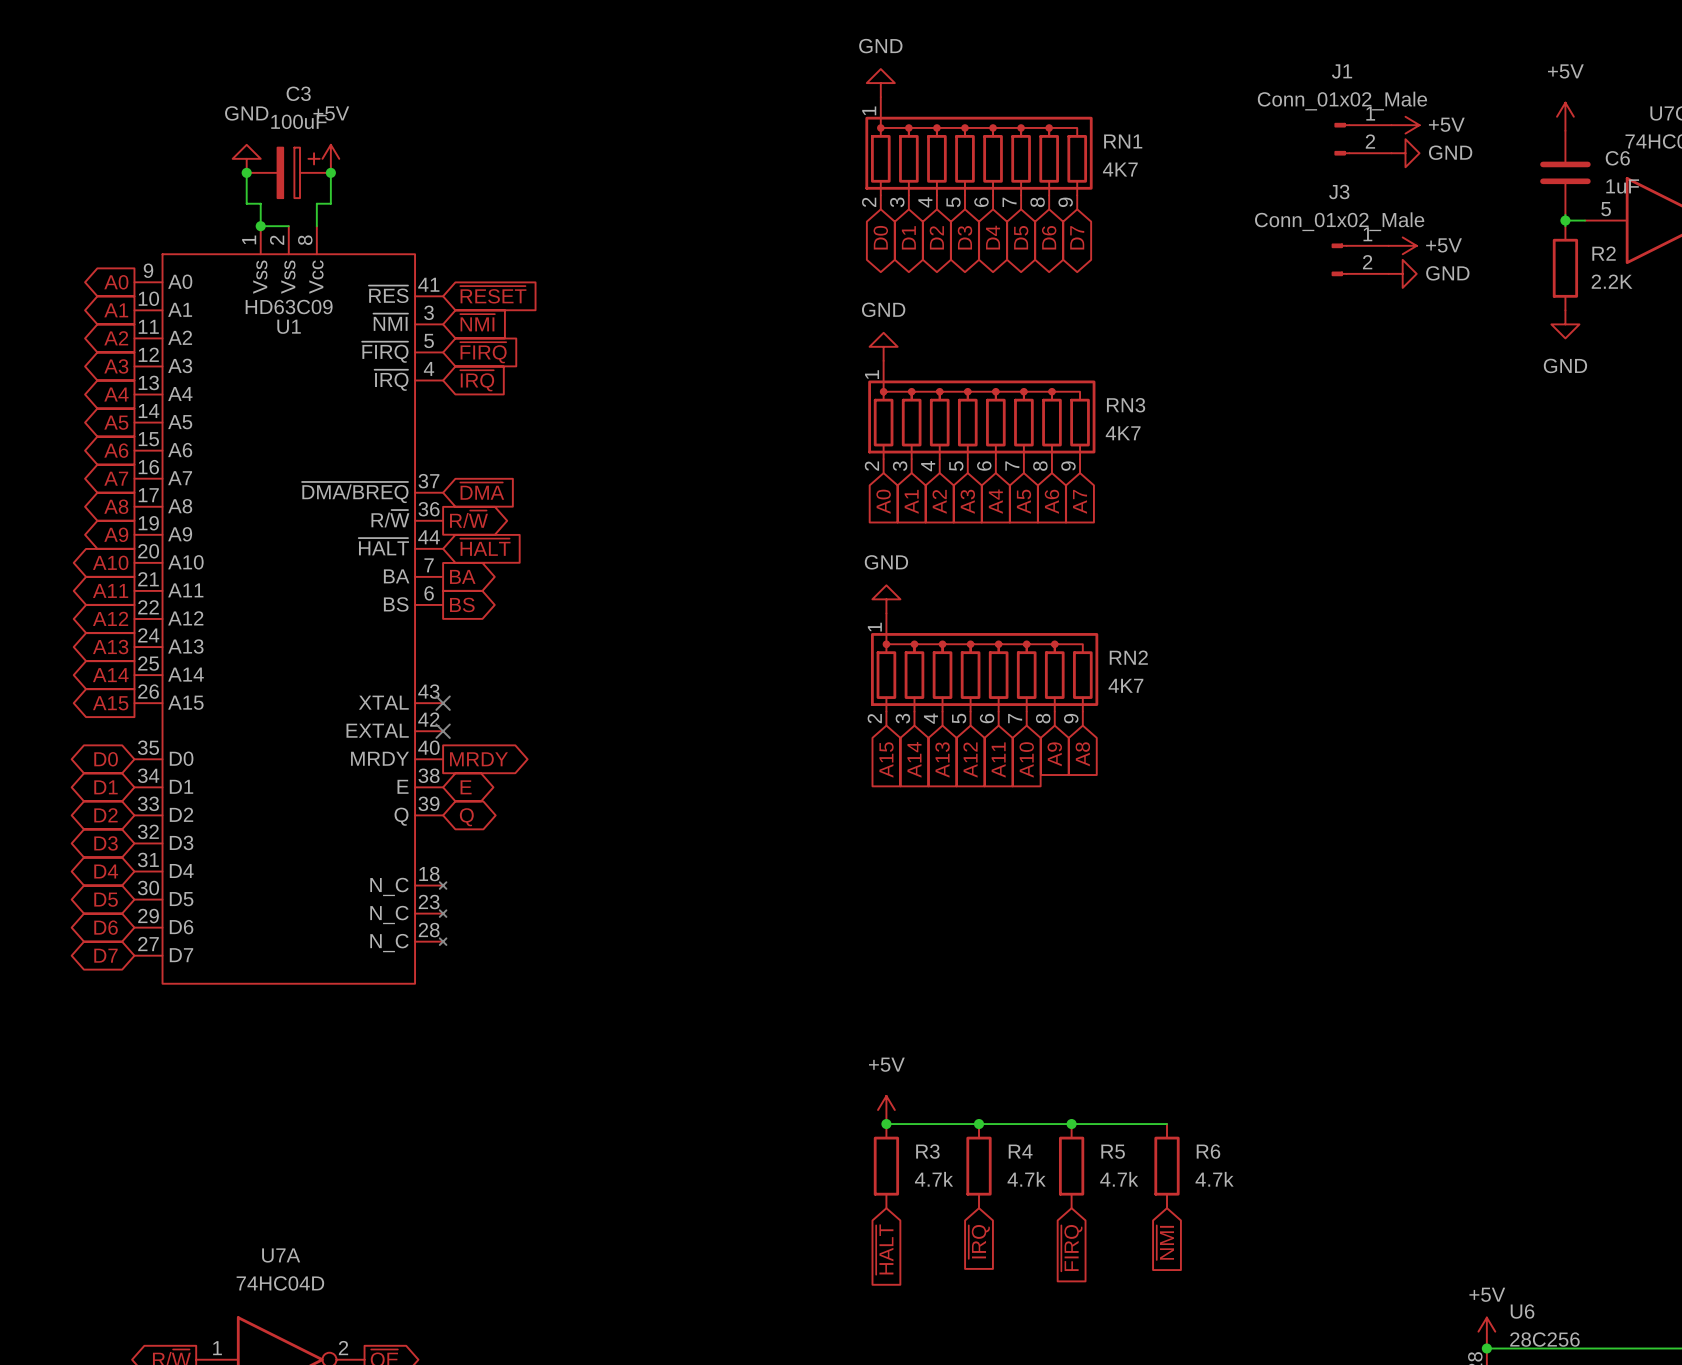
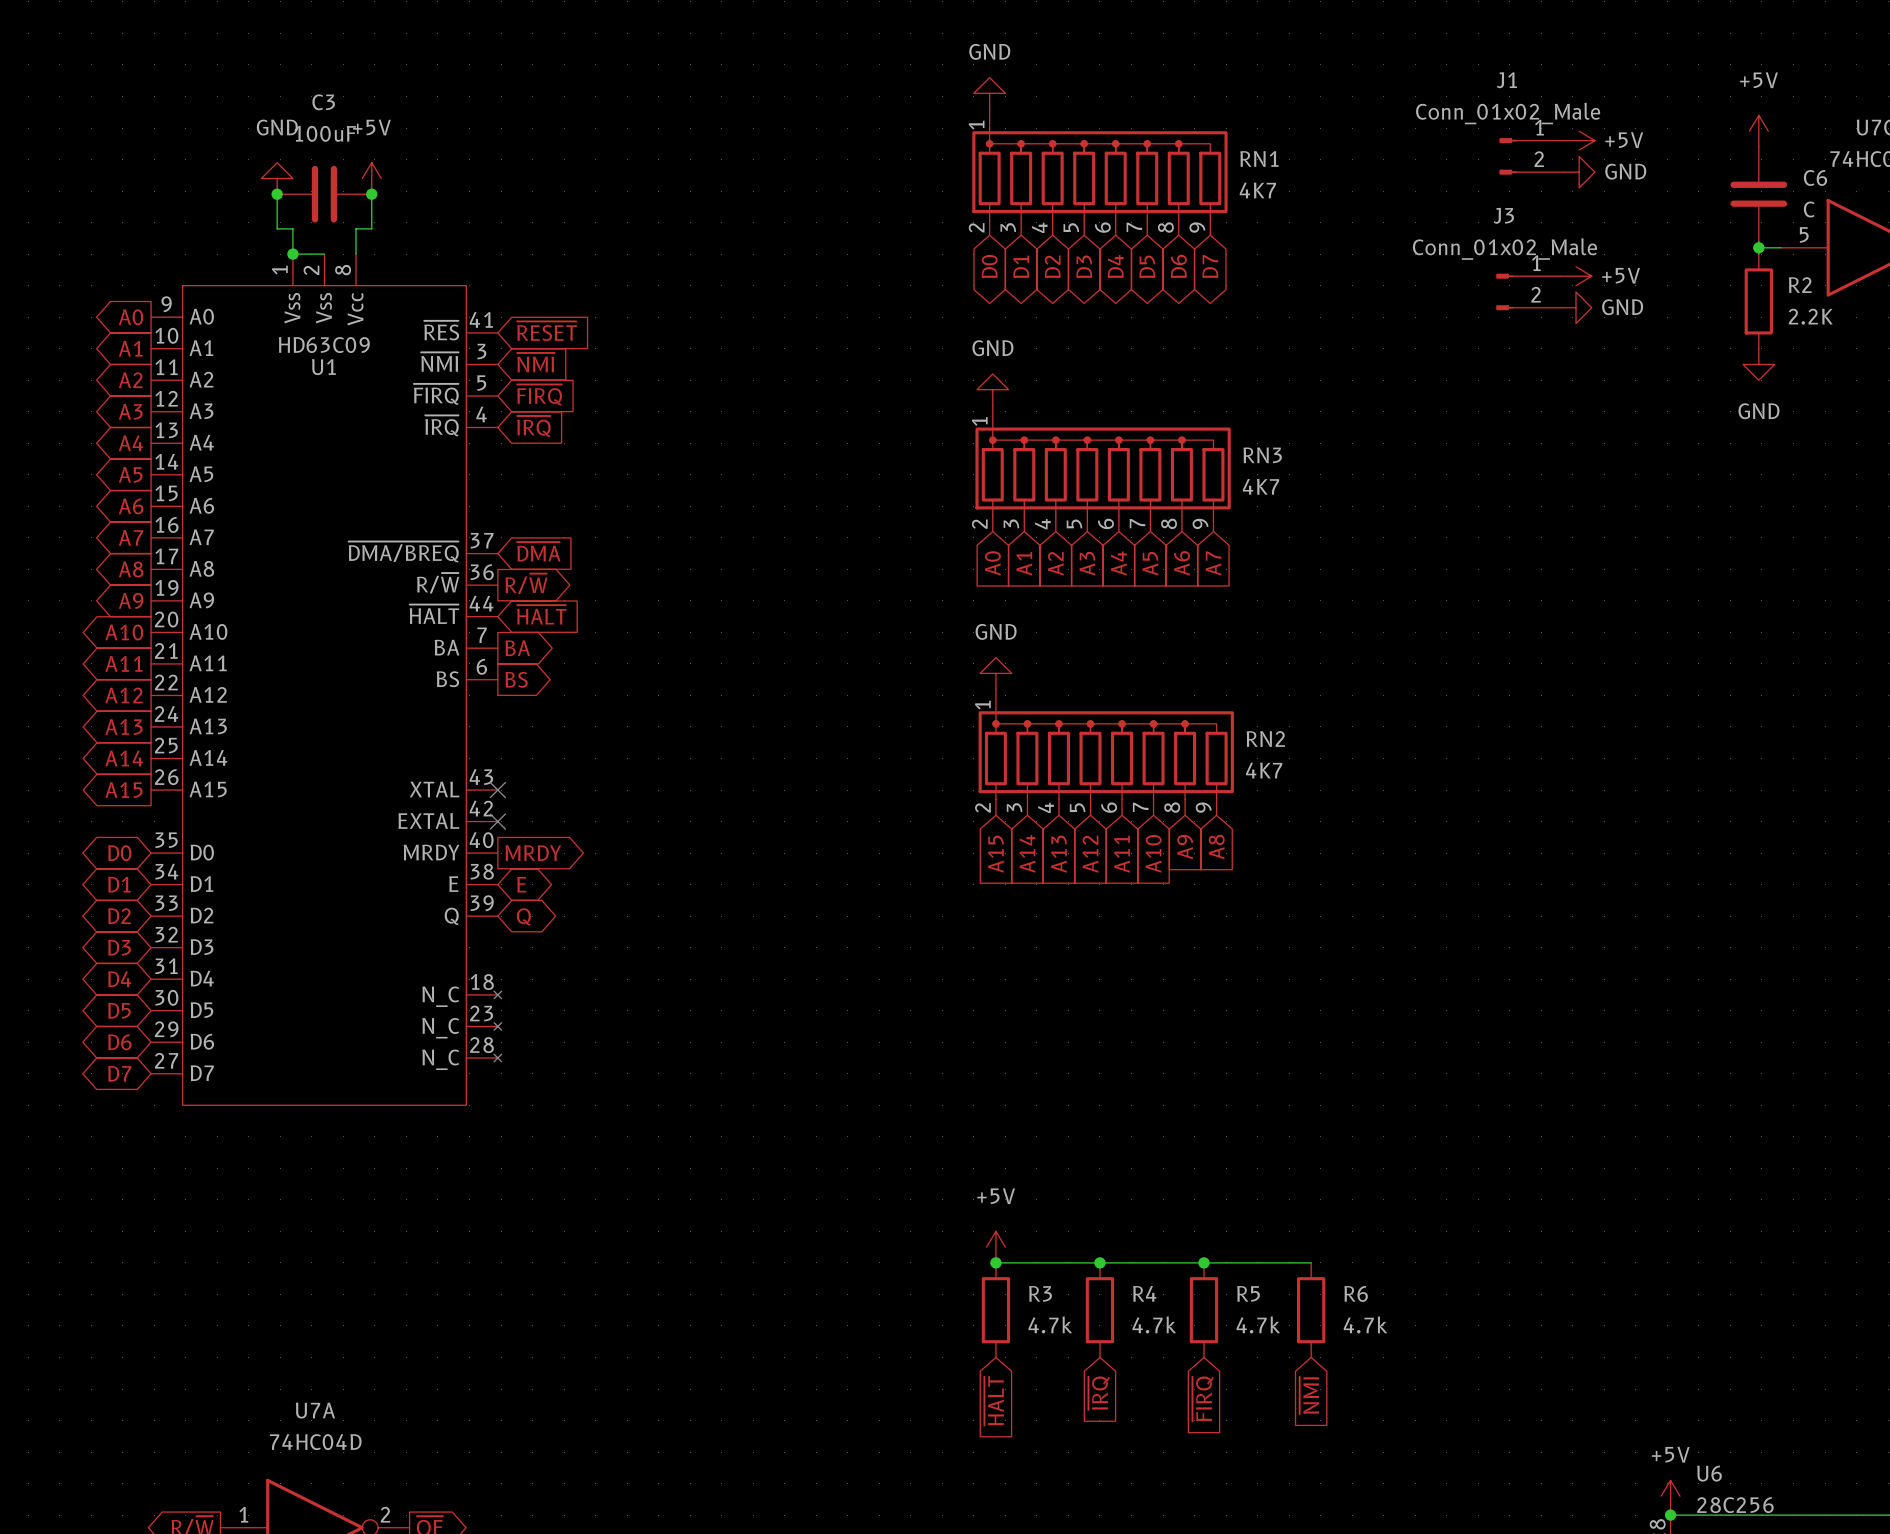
C3 symbol: [246, 147, 331, 199] -> [277, 165, 372, 223]
C6 value: 1uF (1622, 186) -> C (1809, 209)

